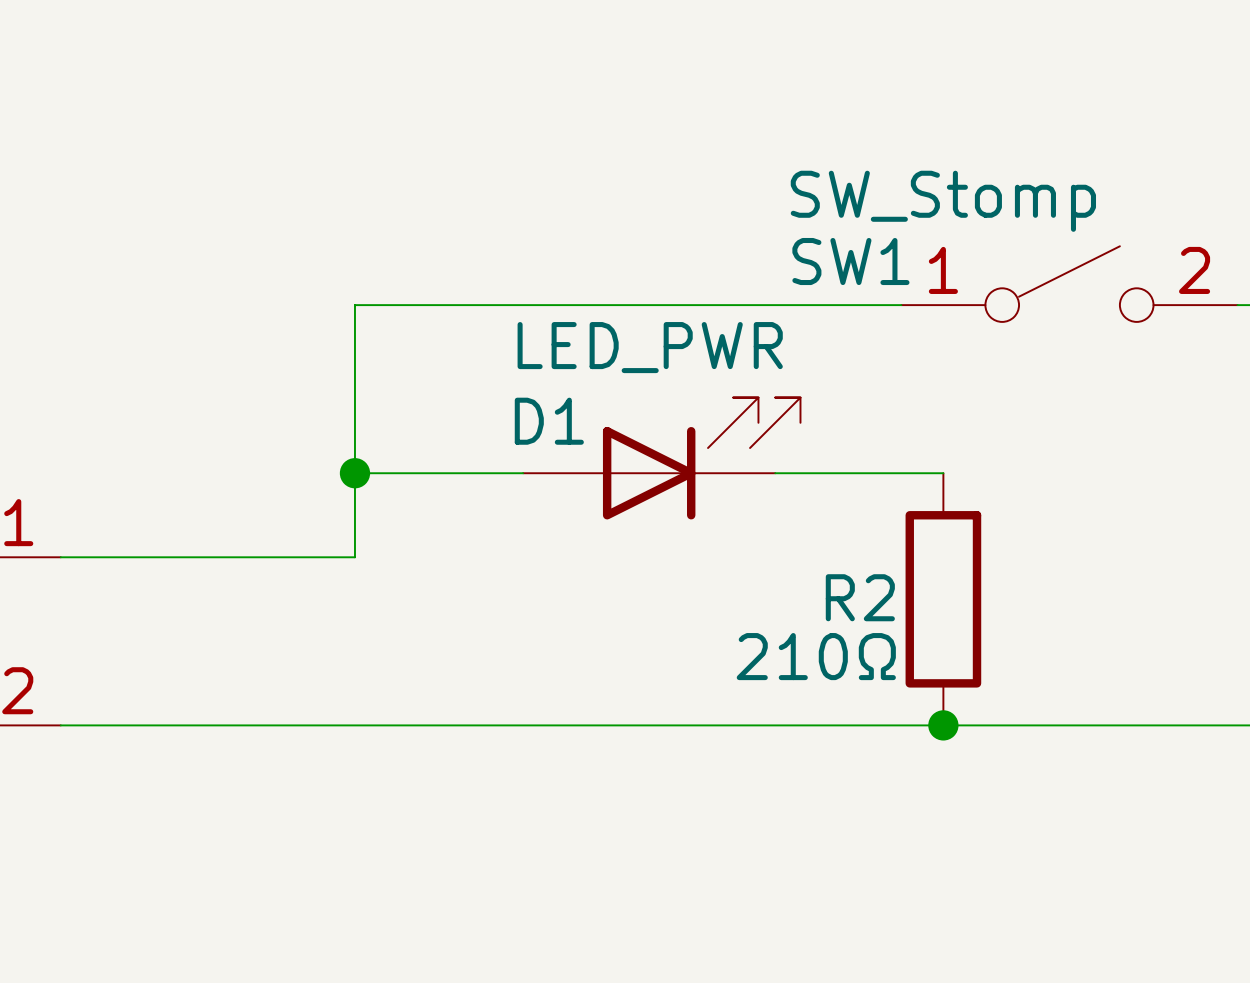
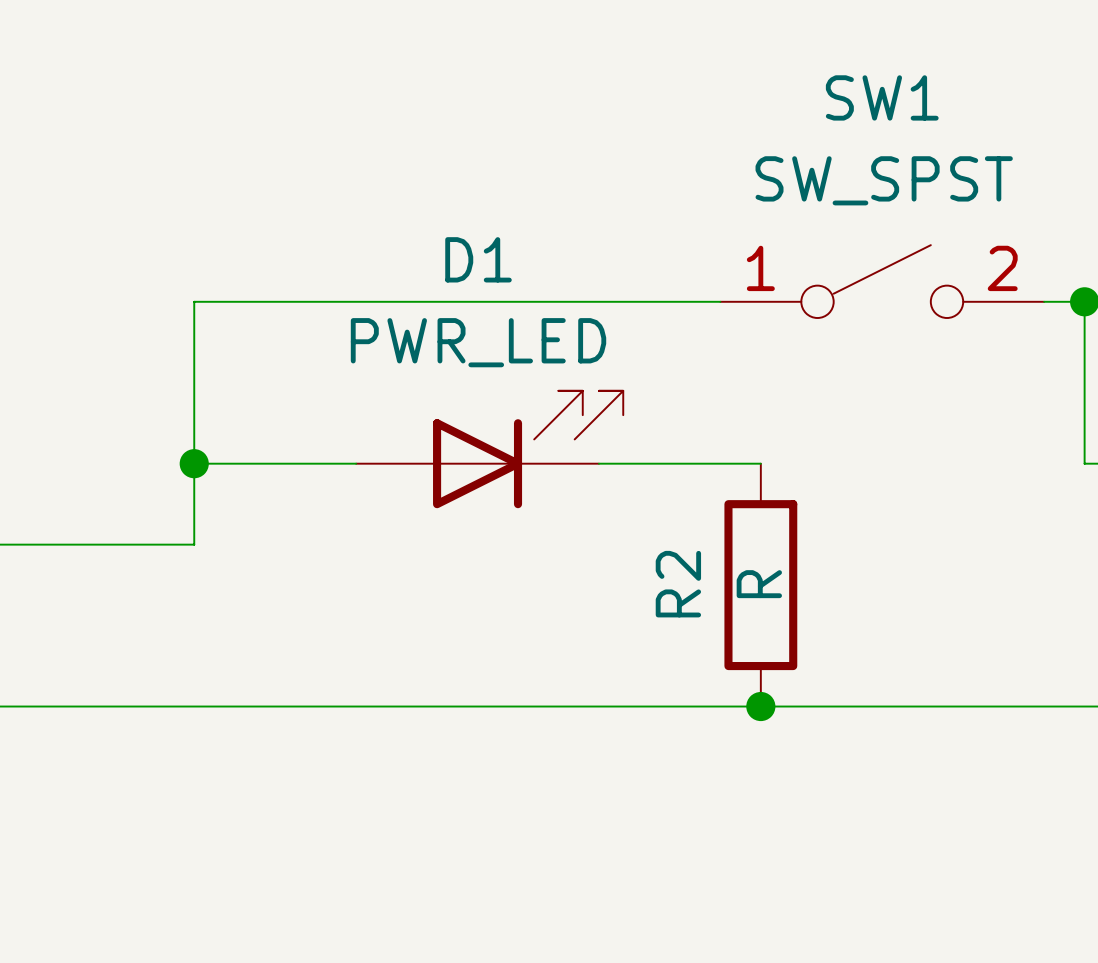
SW1 value: SW_Stomp (943, 201) -> SW_SPST (884, 180)
SW1 name position: SW1 (850, 261) -> SW1 (882, 97)
D1 value: LED_PWR (650, 347) -> PWR_LED (478, 342)
D1 name position: D1 (549, 421) -> D1 (478, 259)
R2 name rotation: 0° (860, 597) -> 90° counterclockwise (678, 584)
R2 value: 210Ω (816, 656) -> R (759, 584)

